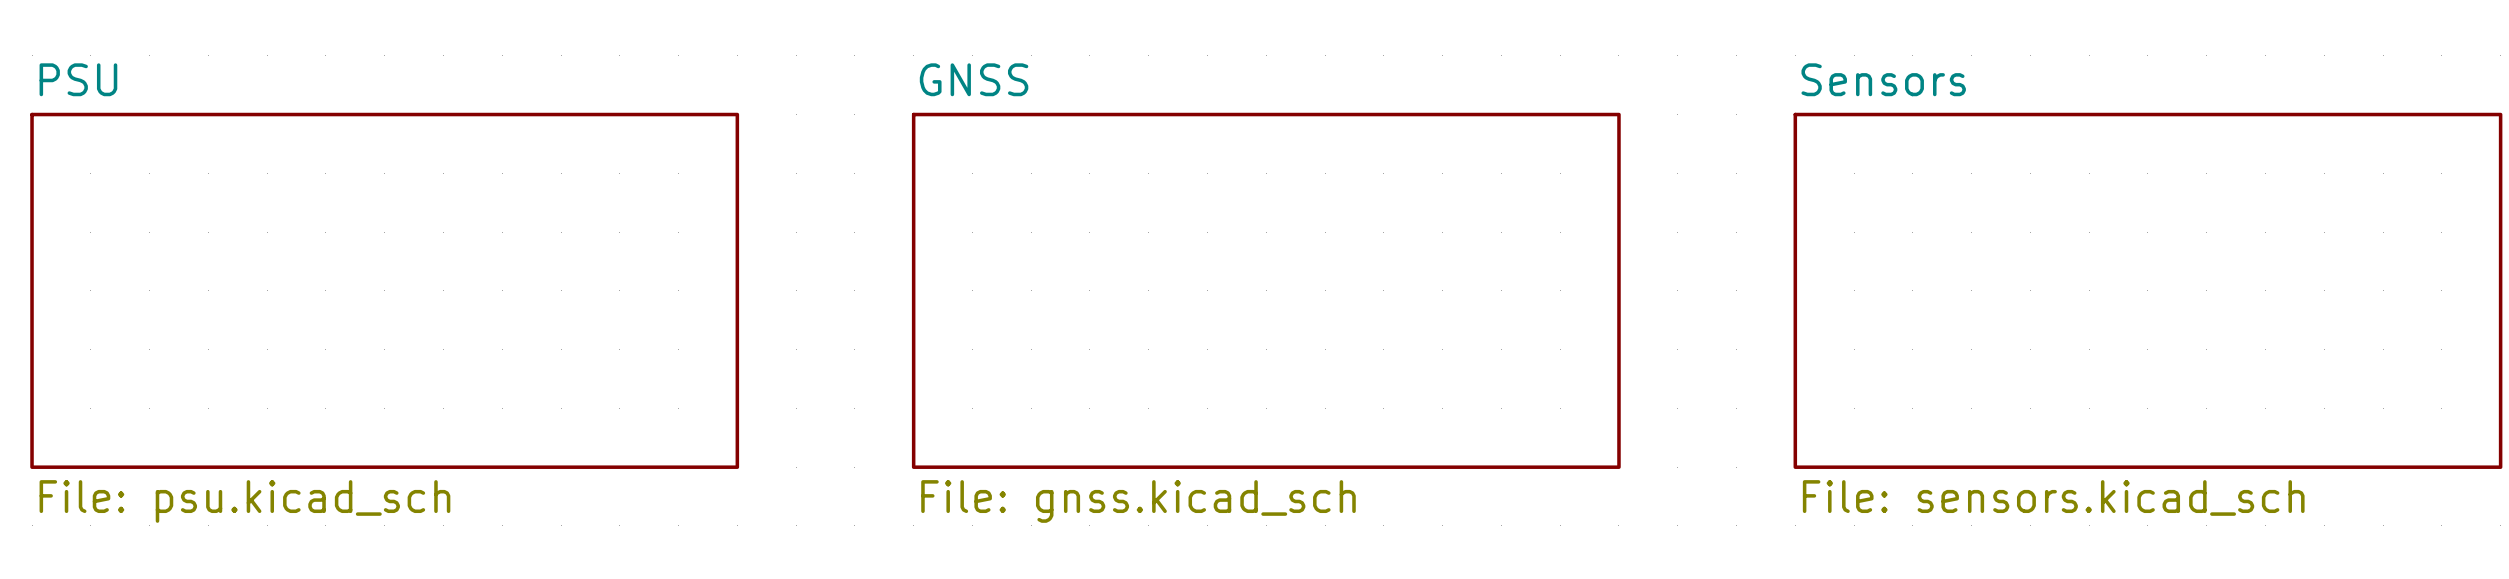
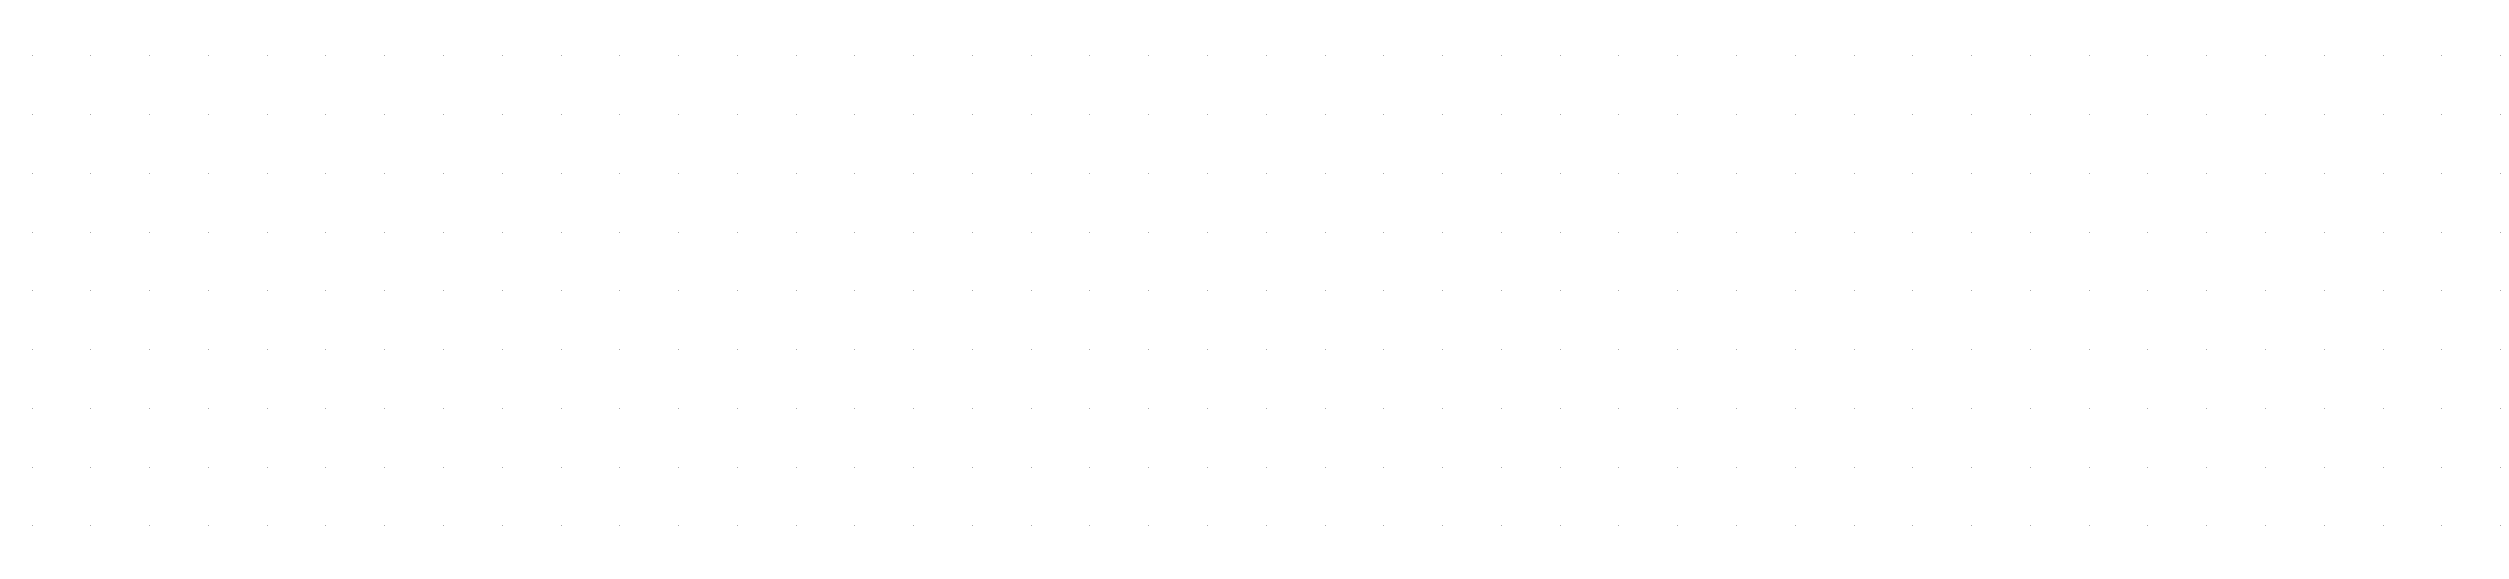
sheet PSU: File: psu.kicad_sch (384, 290) -> none
sheet GNSS: File: gnss.kicad_sch (1266, 290) -> none
sheet Sensors: File: sensors.kicad_sch (2147, 290) -> none

